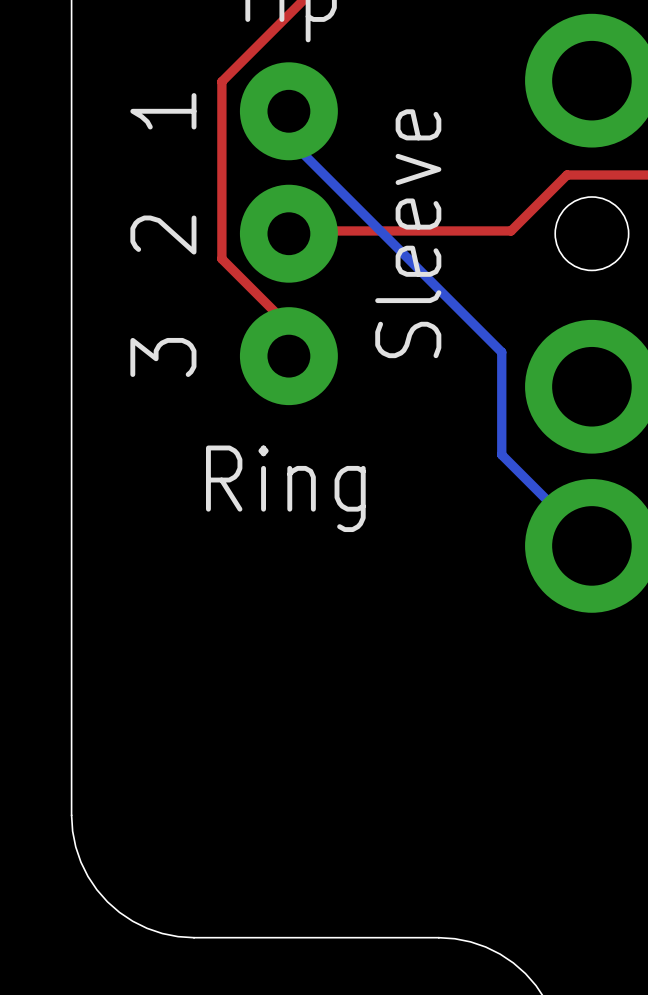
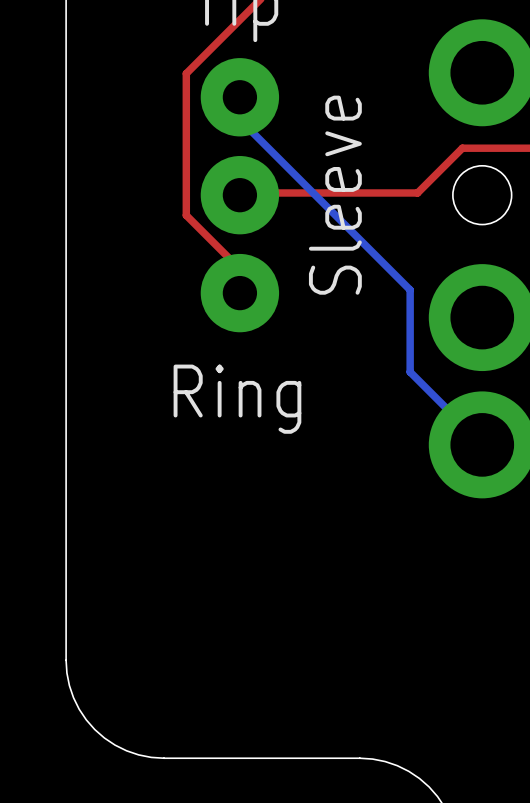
text: 1 (163, 111) -> none
text: 2 (163, 235) -> none
text: 3 (163, 357) -> none

